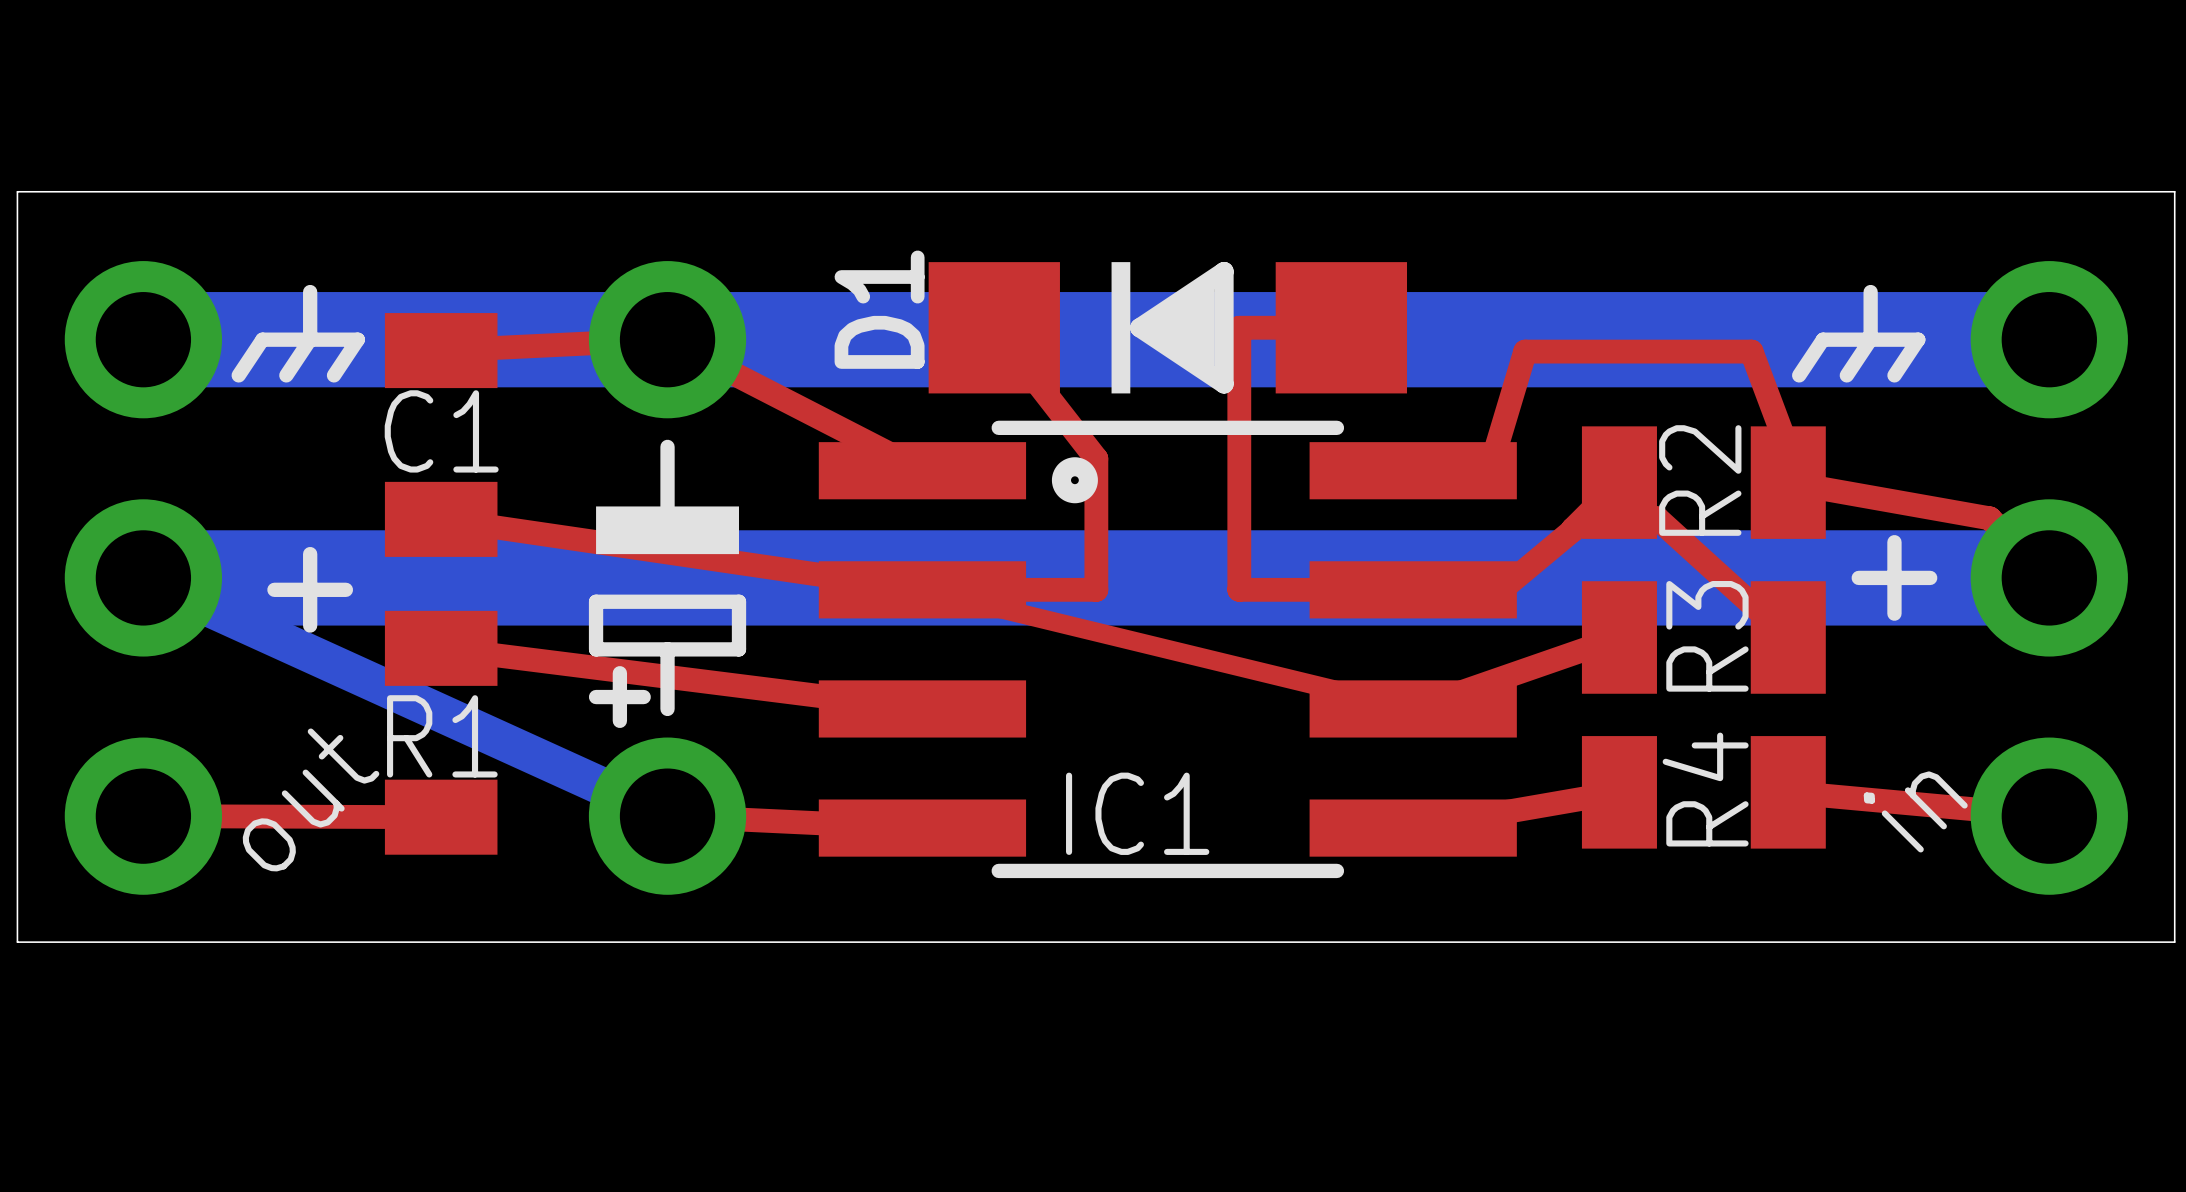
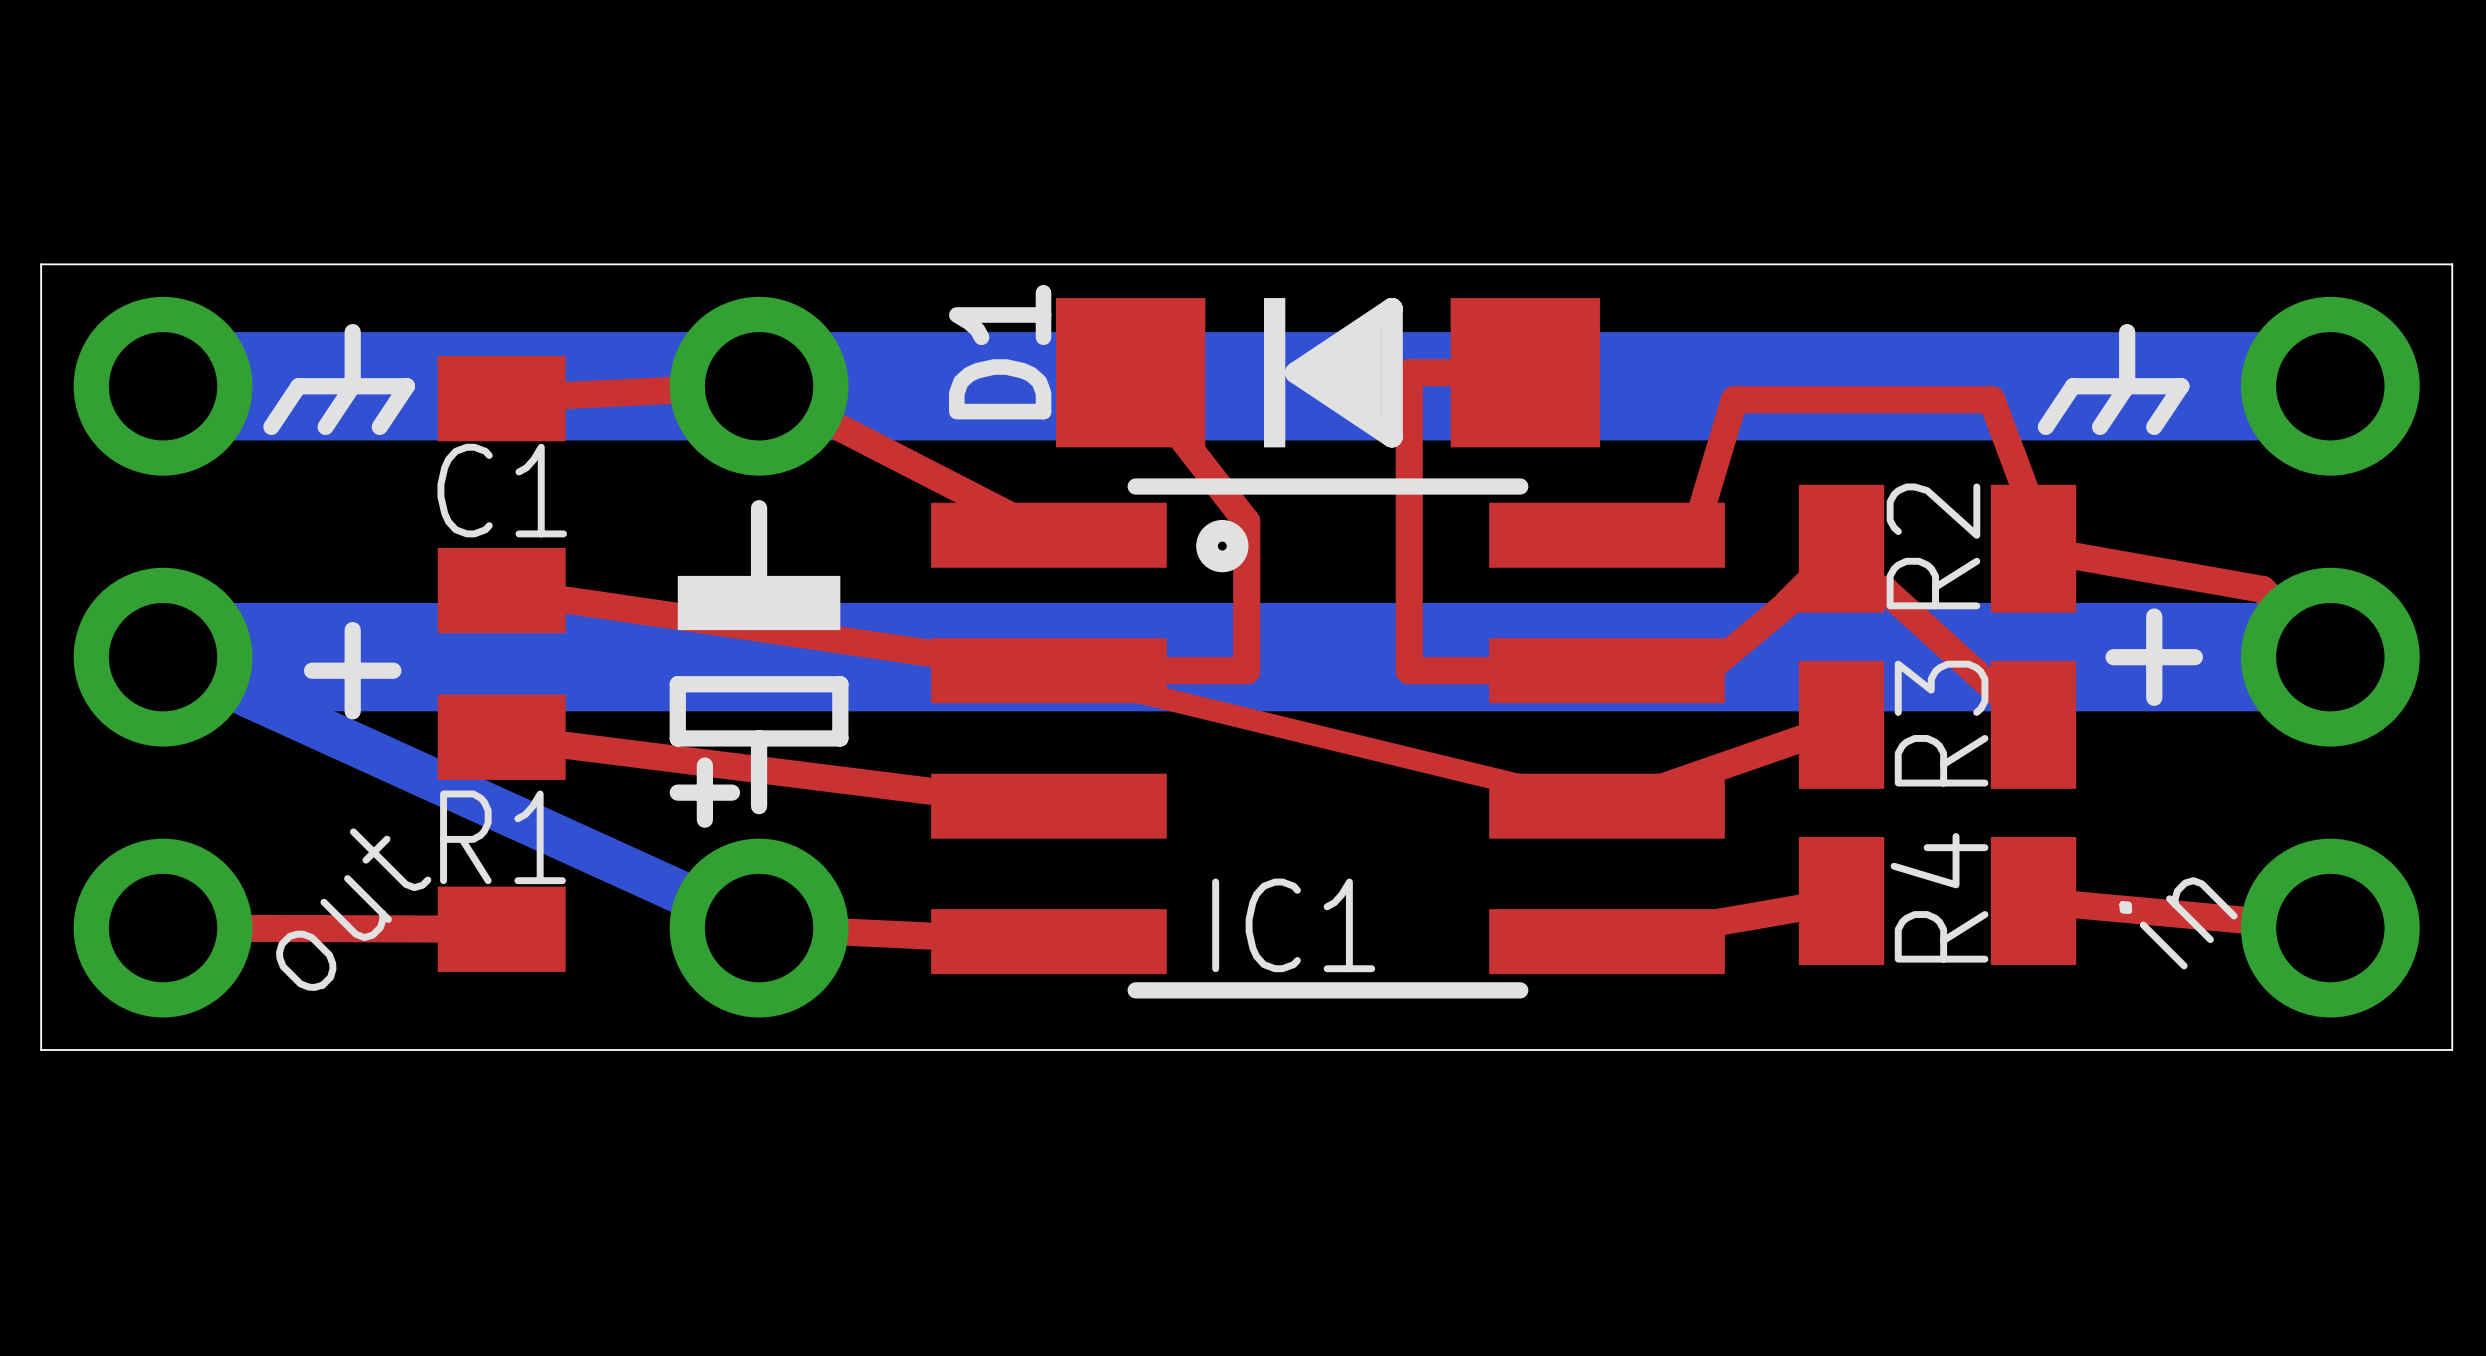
board edge: (17, 191) (2174, 191) (2174, 942) (17, 942) (17, 191) -> (41, 264) (41, 1049) (2452, 1049) (2452, 264) (41, 264)

